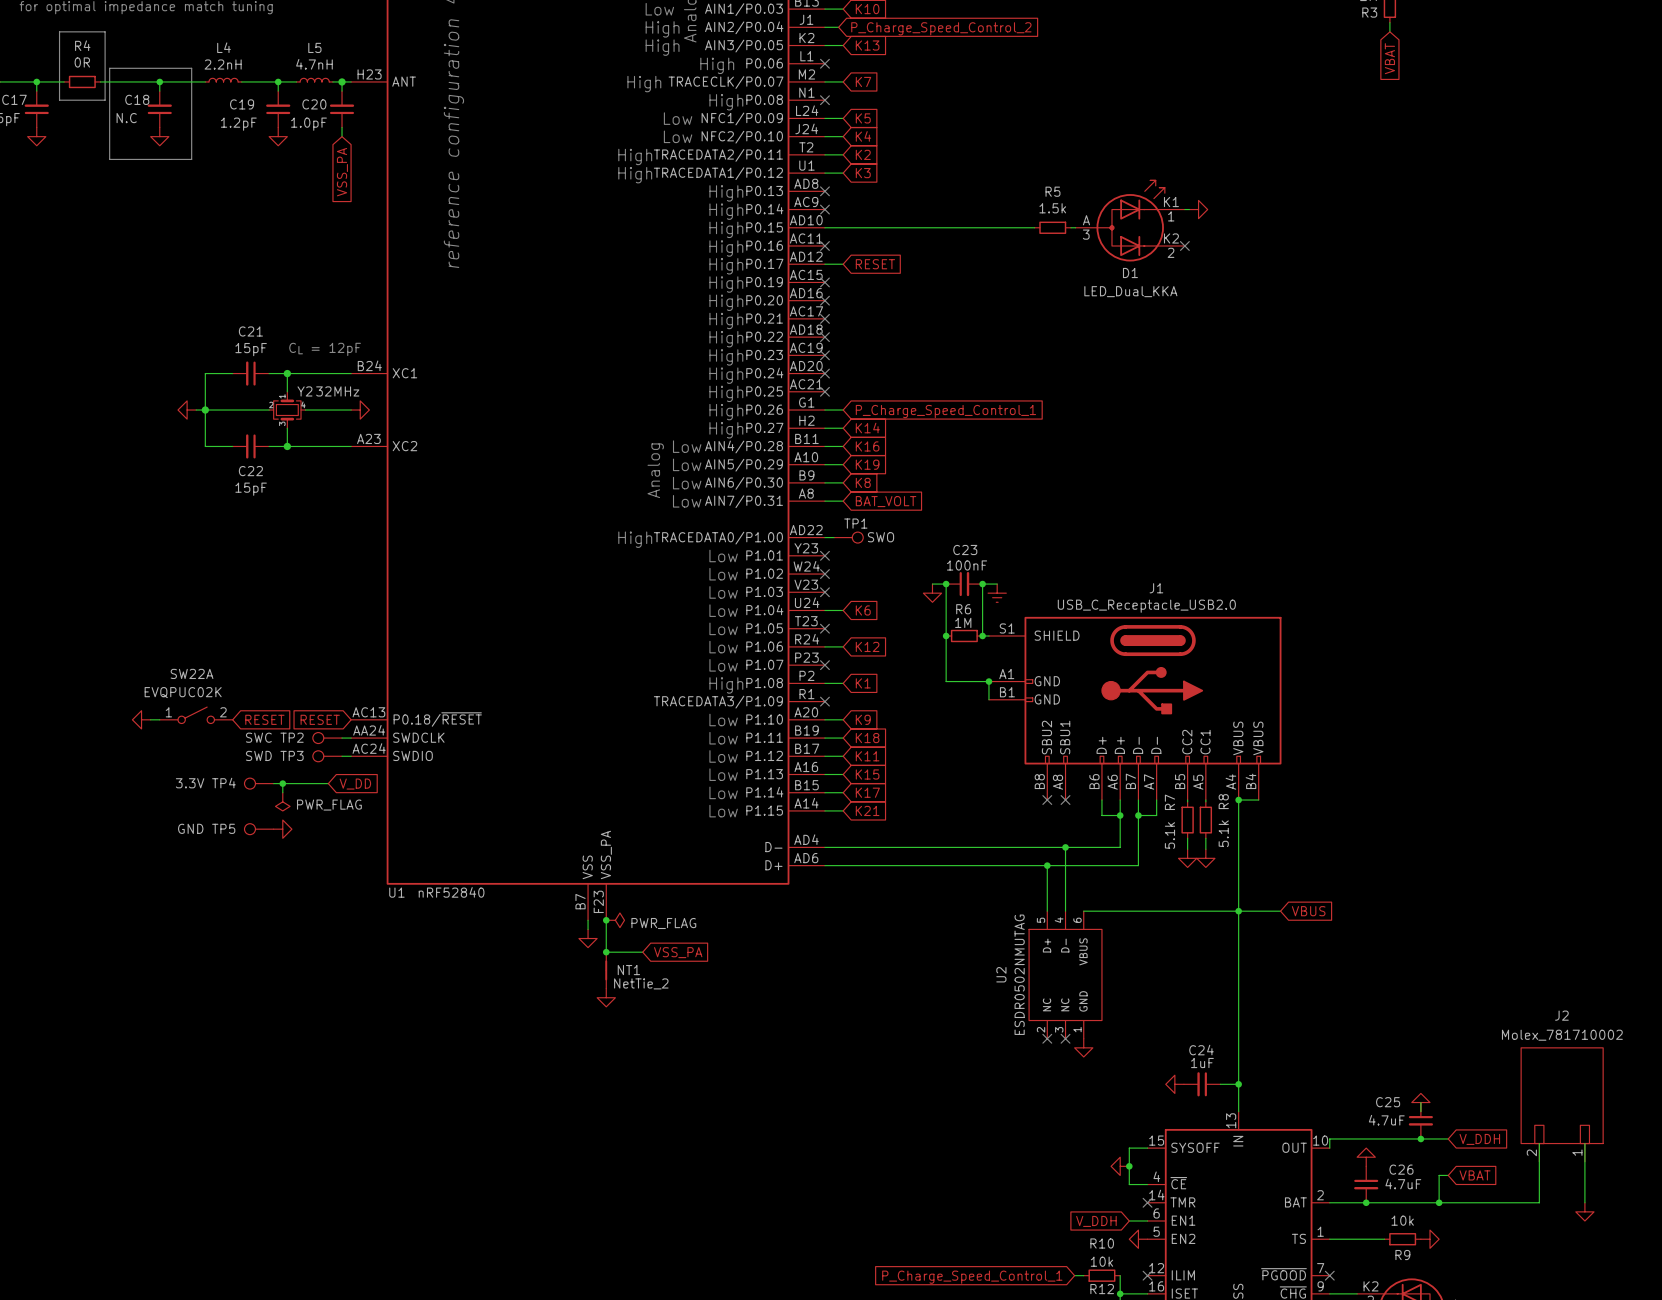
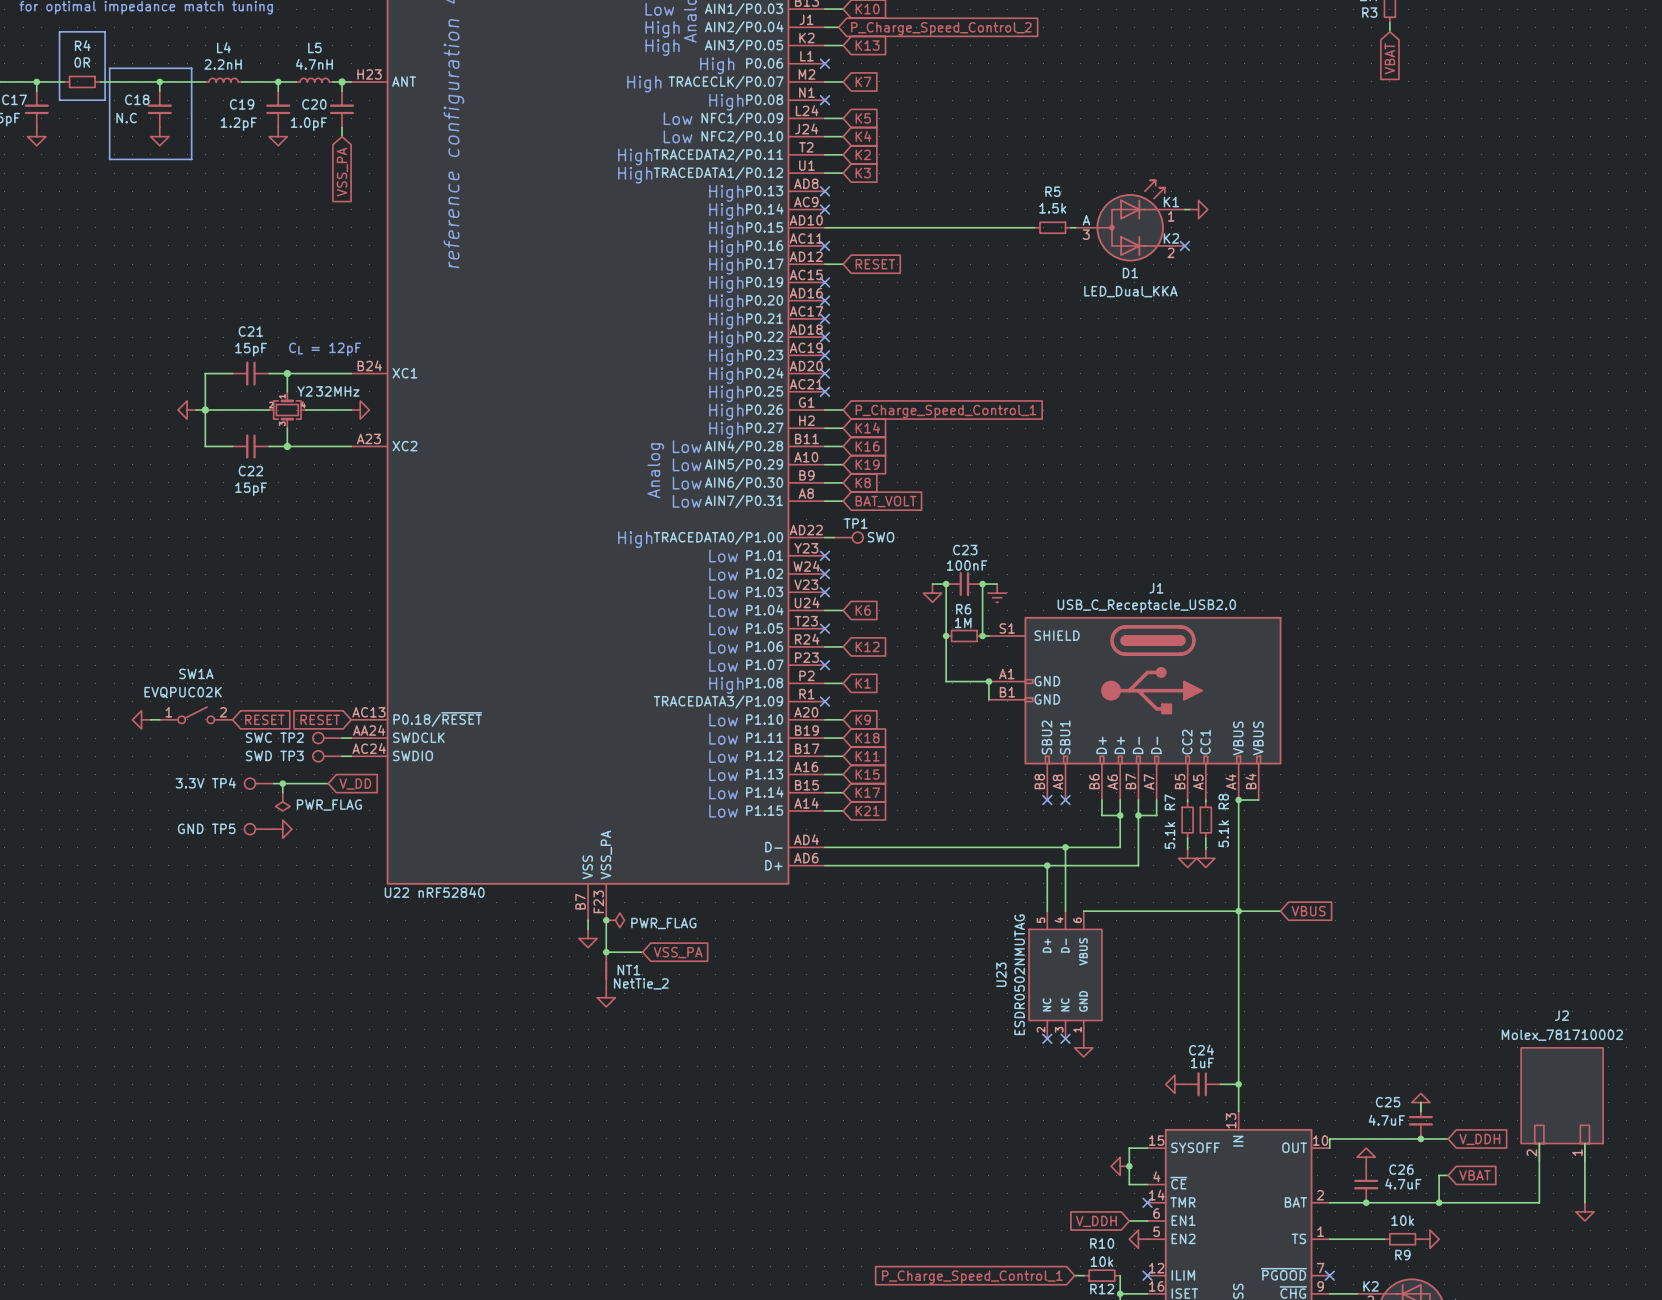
SW22A name: SW22A (192, 673) -> SW1A (196, 673)
U1 name: U1 (396, 892) -> U22 (396, 892)
U2 name: U2 (1001, 974) -> U23 (1001, 974)

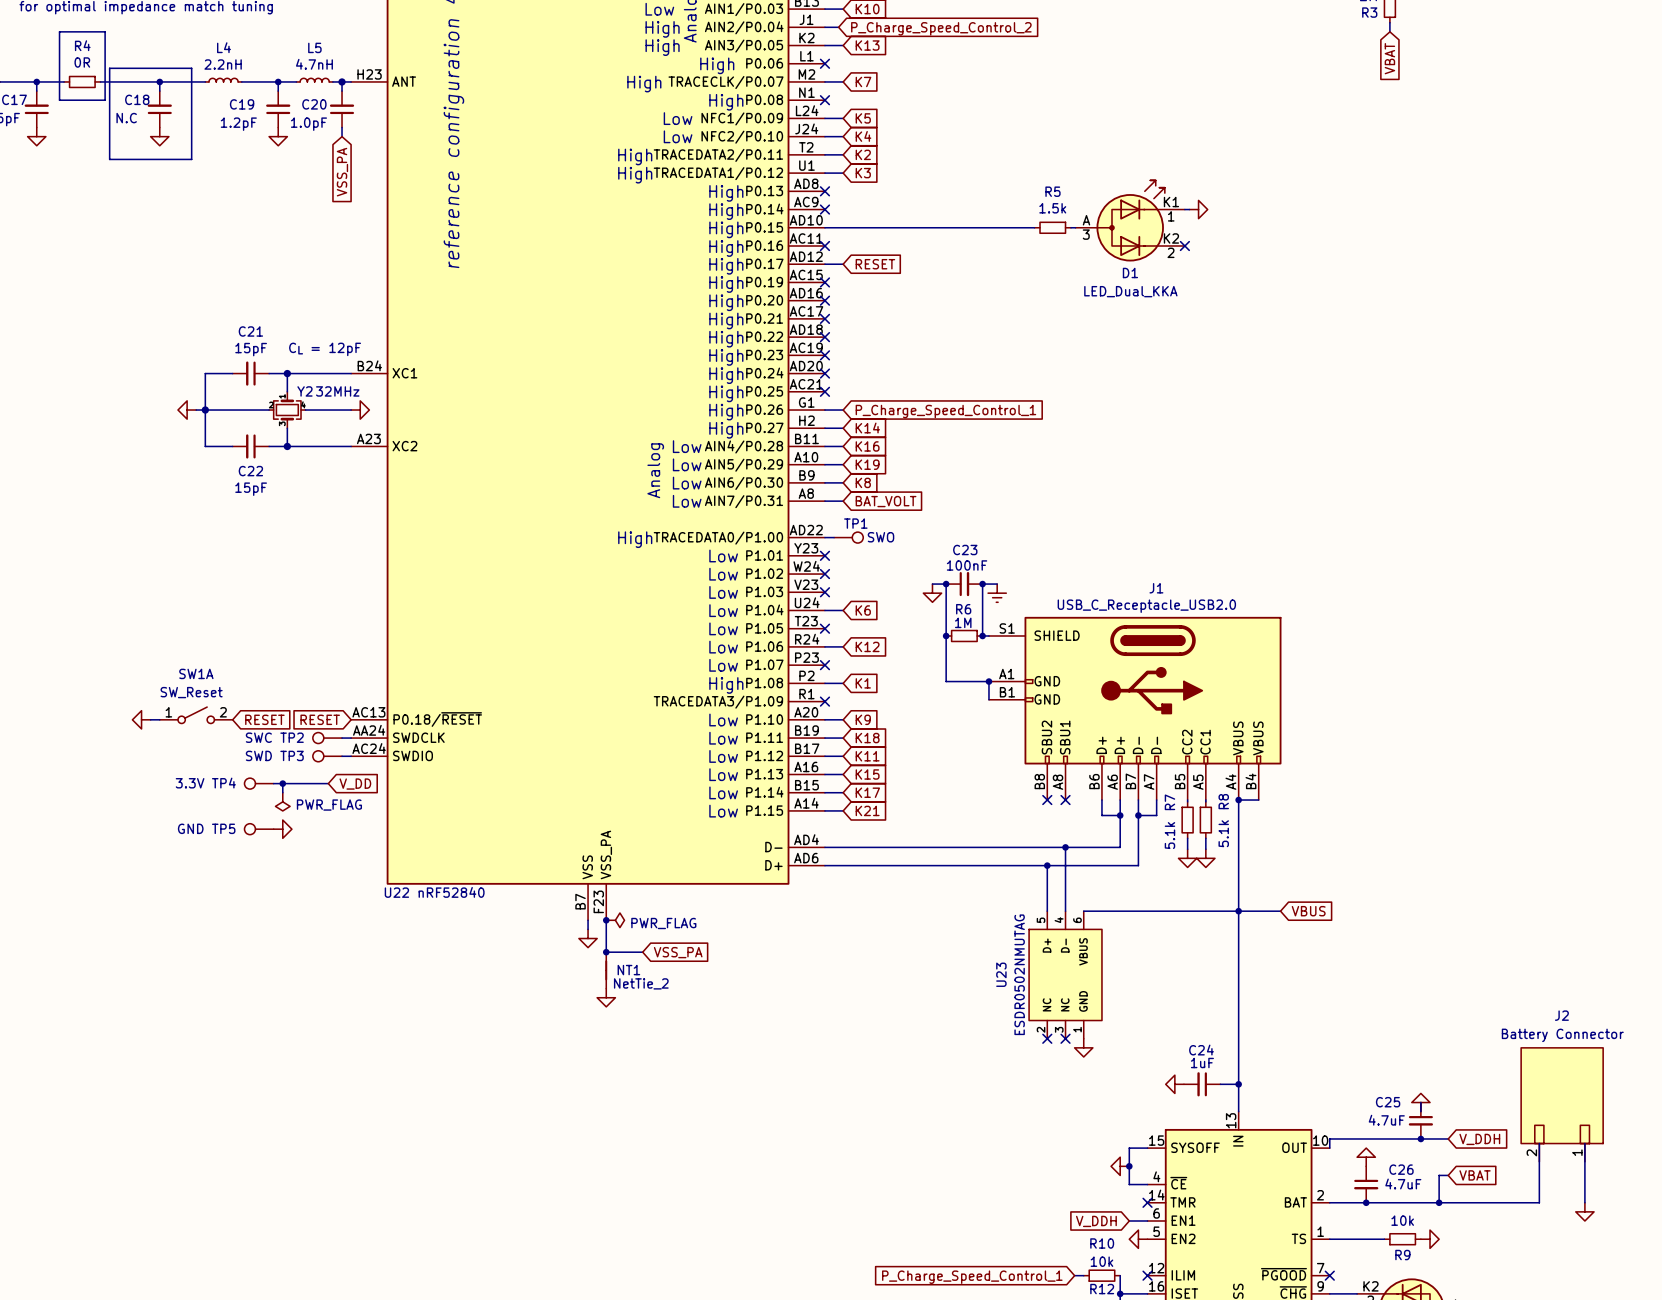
SW1A value: EVQPUC02K (183, 692) -> SW_Reset (191, 692)
J2 value: Molex_781710002 (1562, 1035) -> Battery Connector (1562, 1035)

